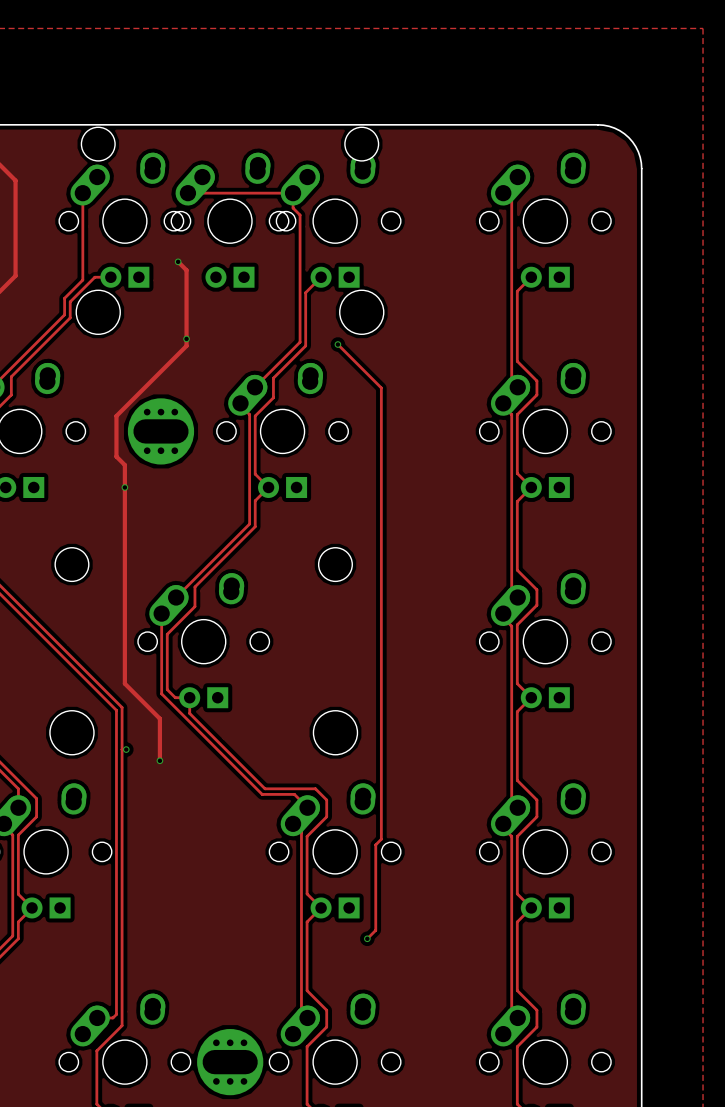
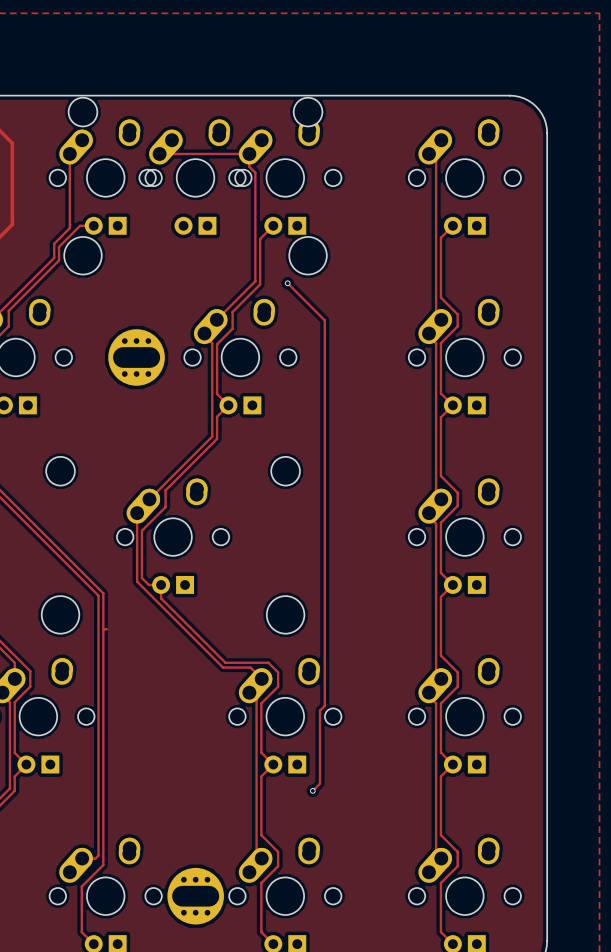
track: (178, 261) (186, 270) (186, 345) (116, 416) (116, 456) (124, 465) (124, 683) (159, 718) (159, 760) -> none
via: (178, 261) -> none
via: (186, 338) -> none
via: (124, 487) -> none
via: (126, 749) -> none
via: (159, 760) -> none

